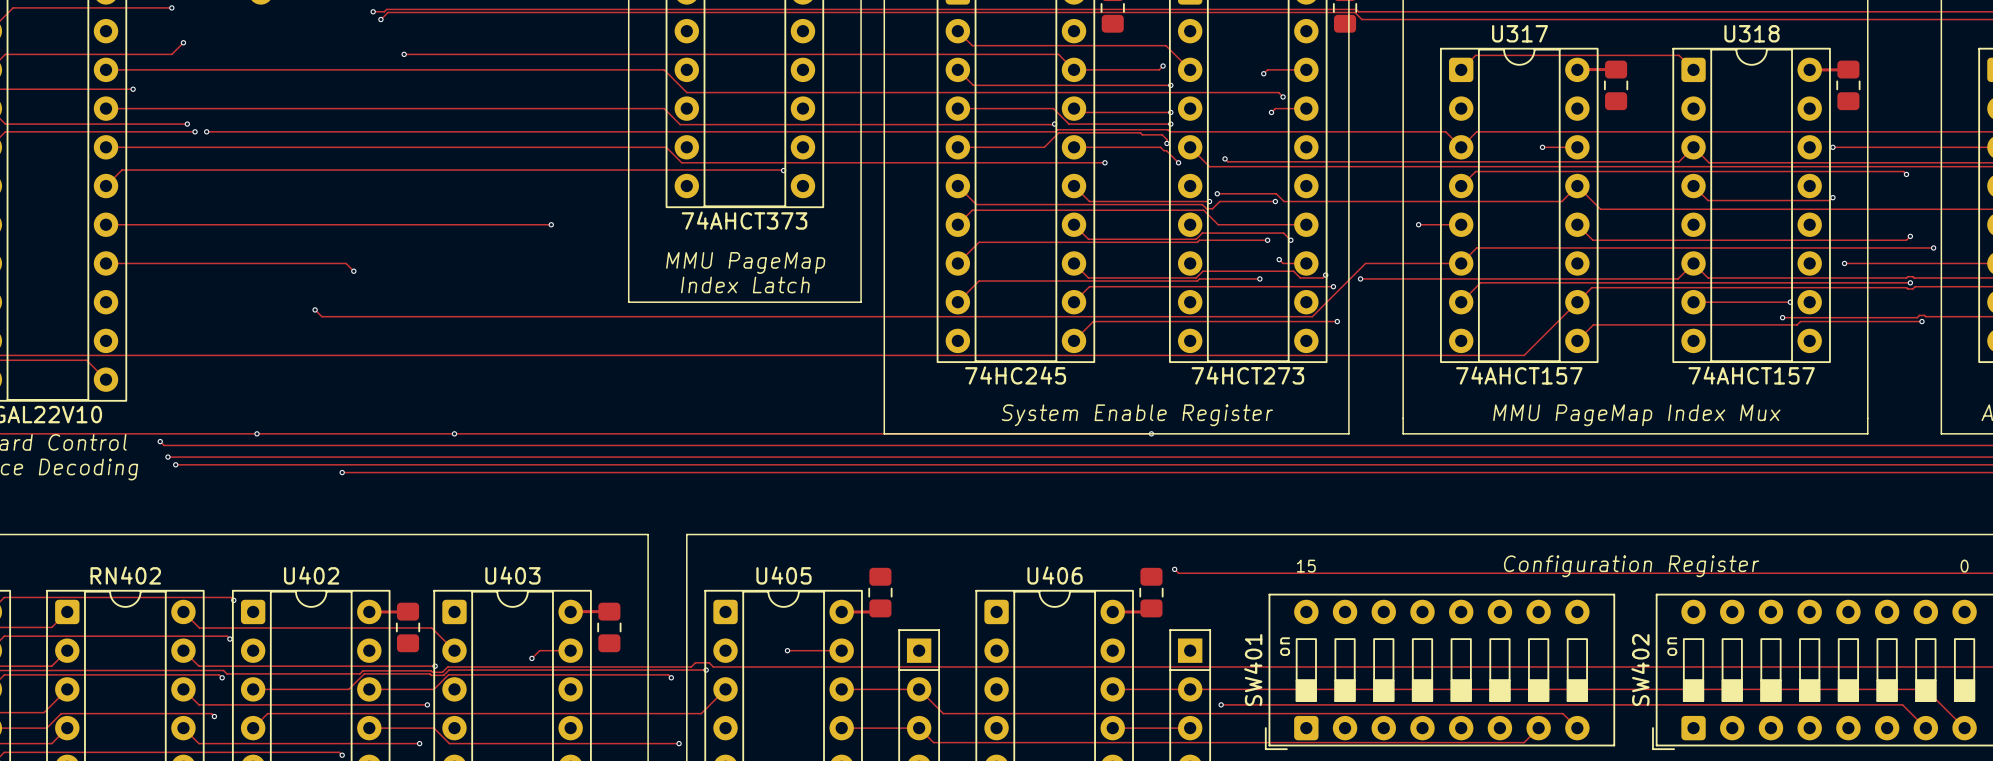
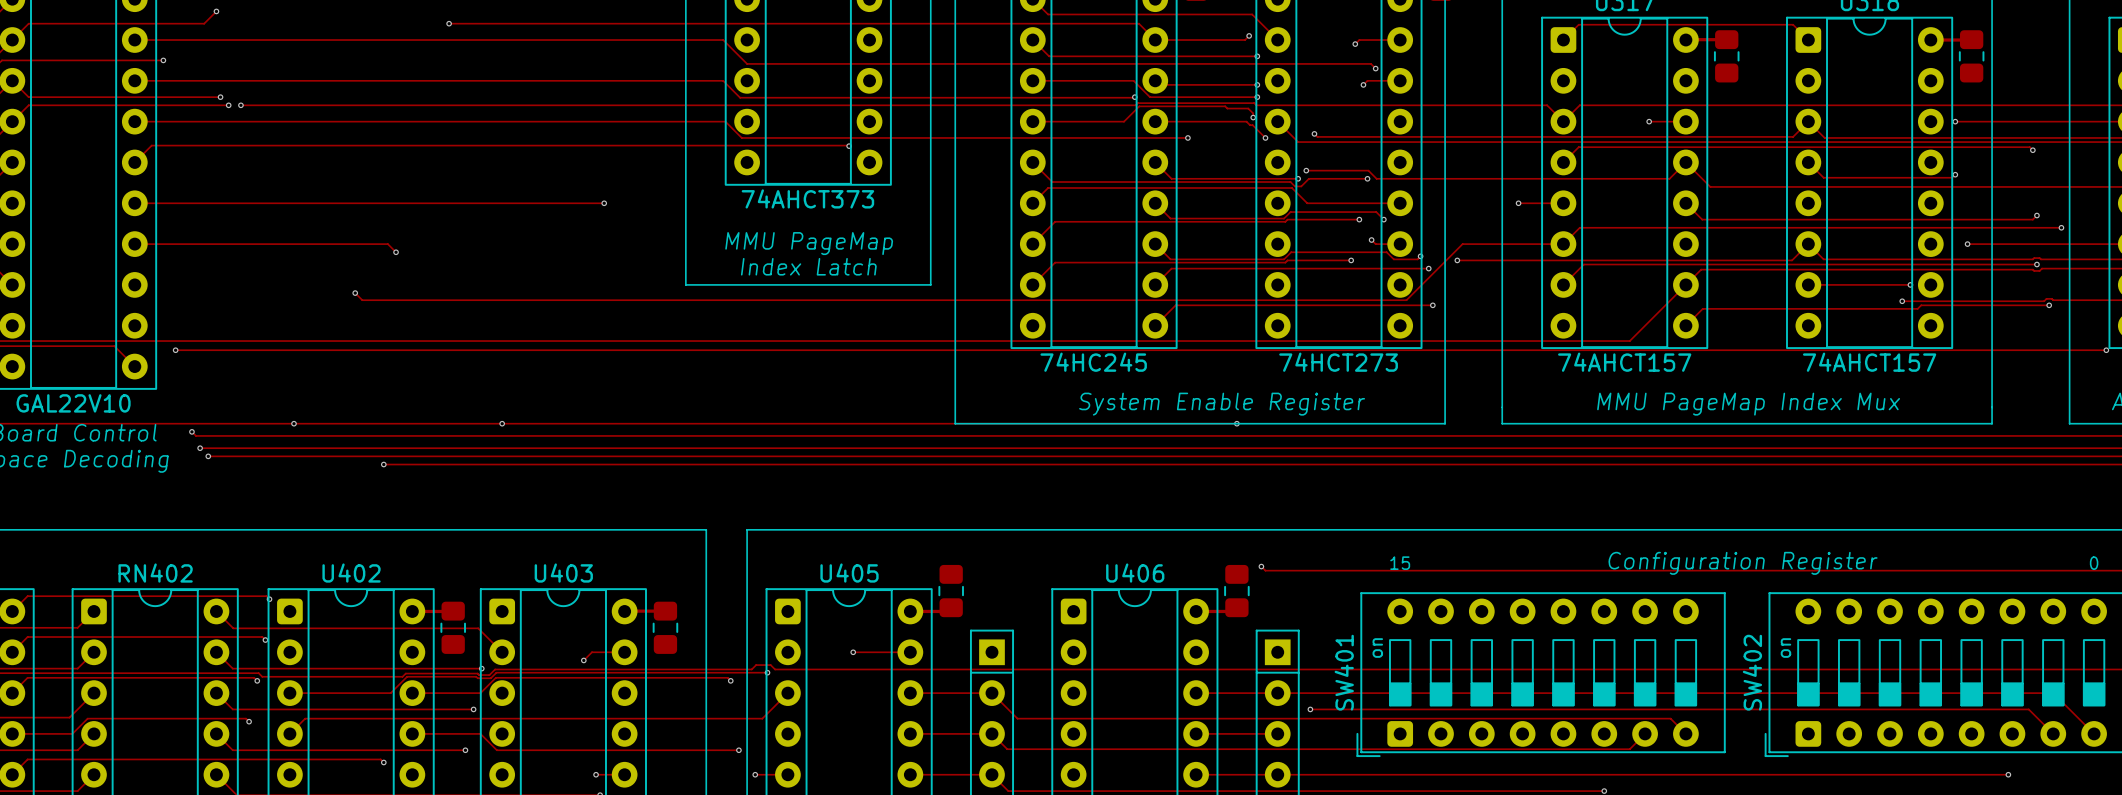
track: none -> (175, 350) (2106, 350)
via: none -> (175, 350)
via: none -> (2106, 350)

